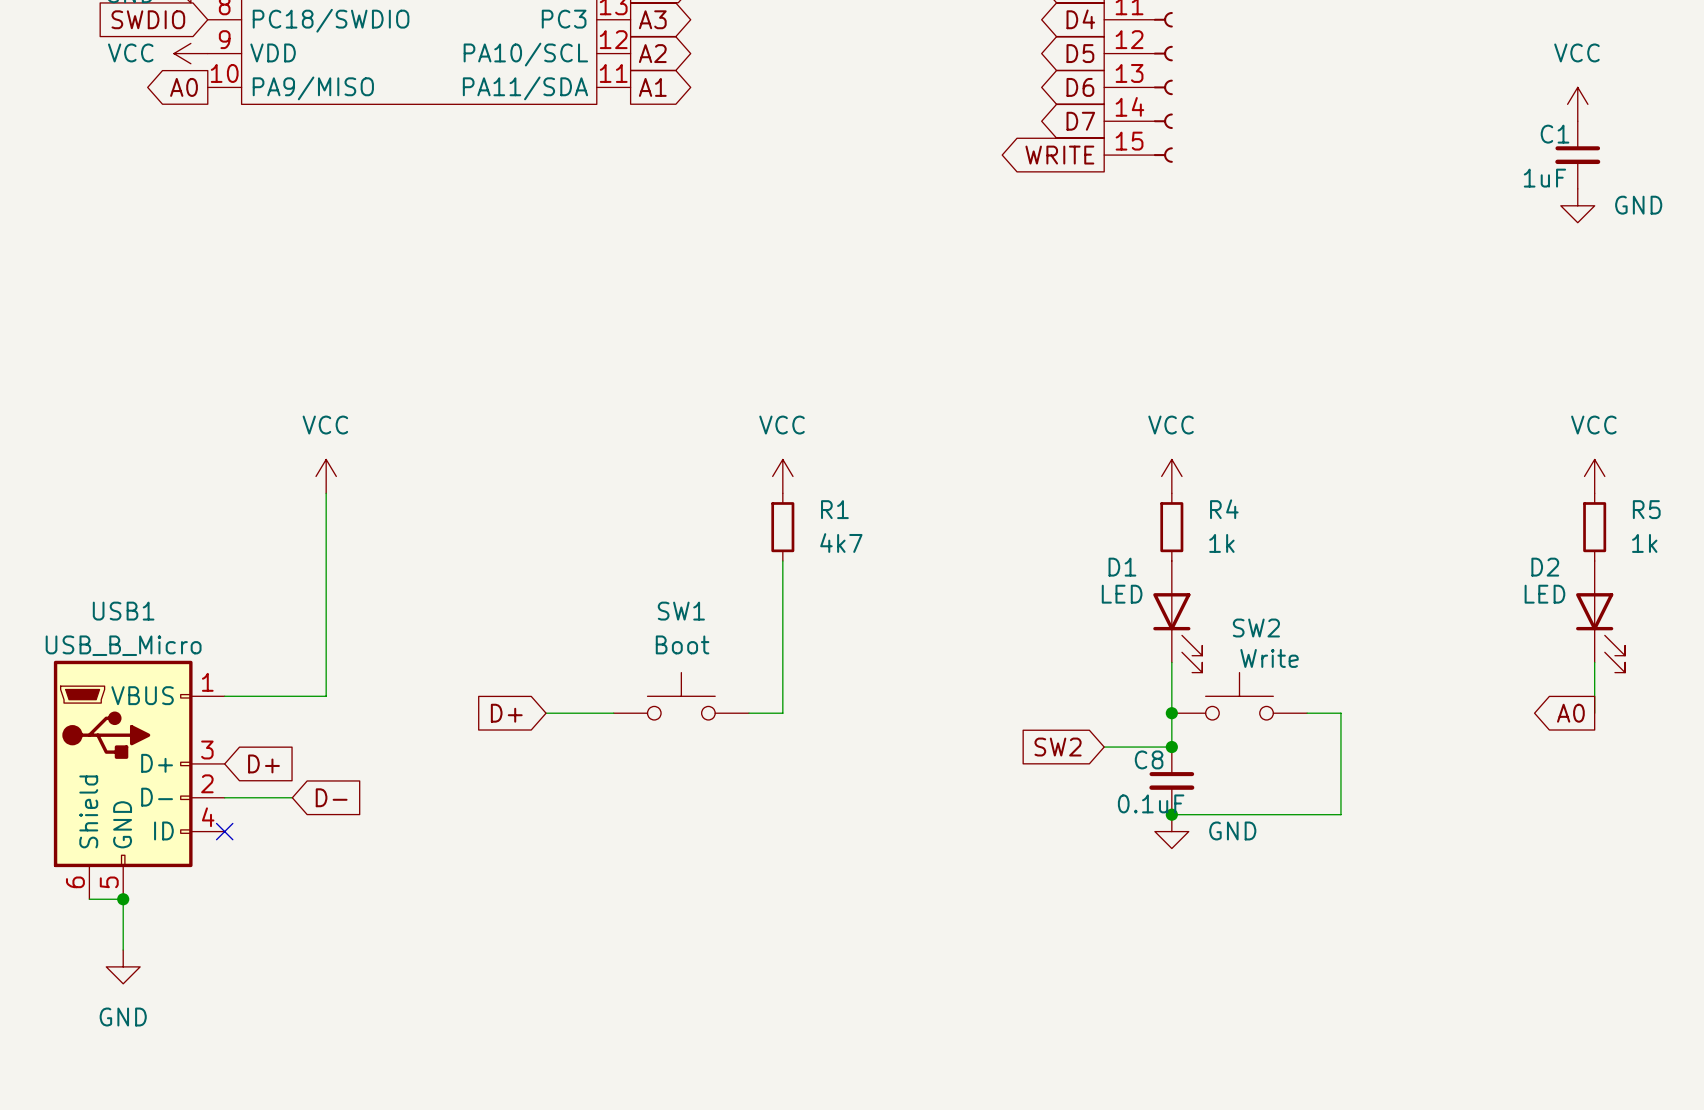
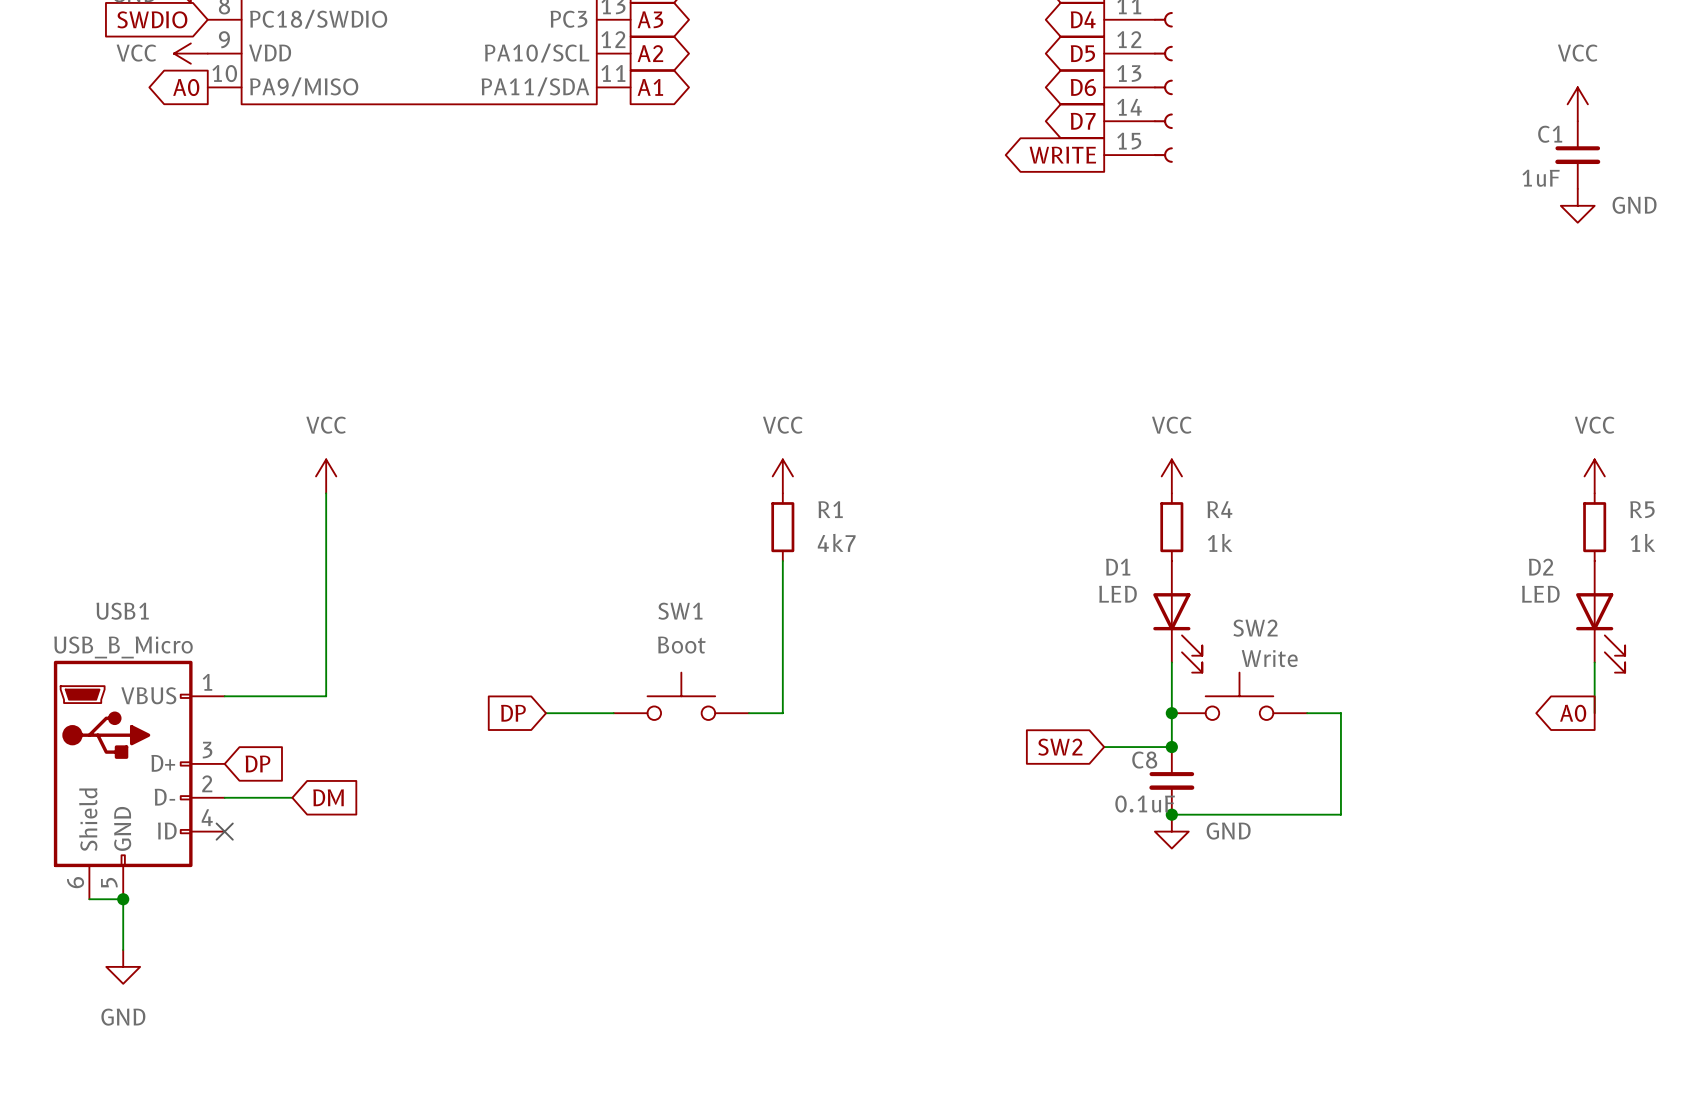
global label: D+ (506, 713) -> DP (513, 713)
global label: D+ (263, 763) -> DP (257, 763)
global label: D- (331, 797) -> DM (328, 797)

